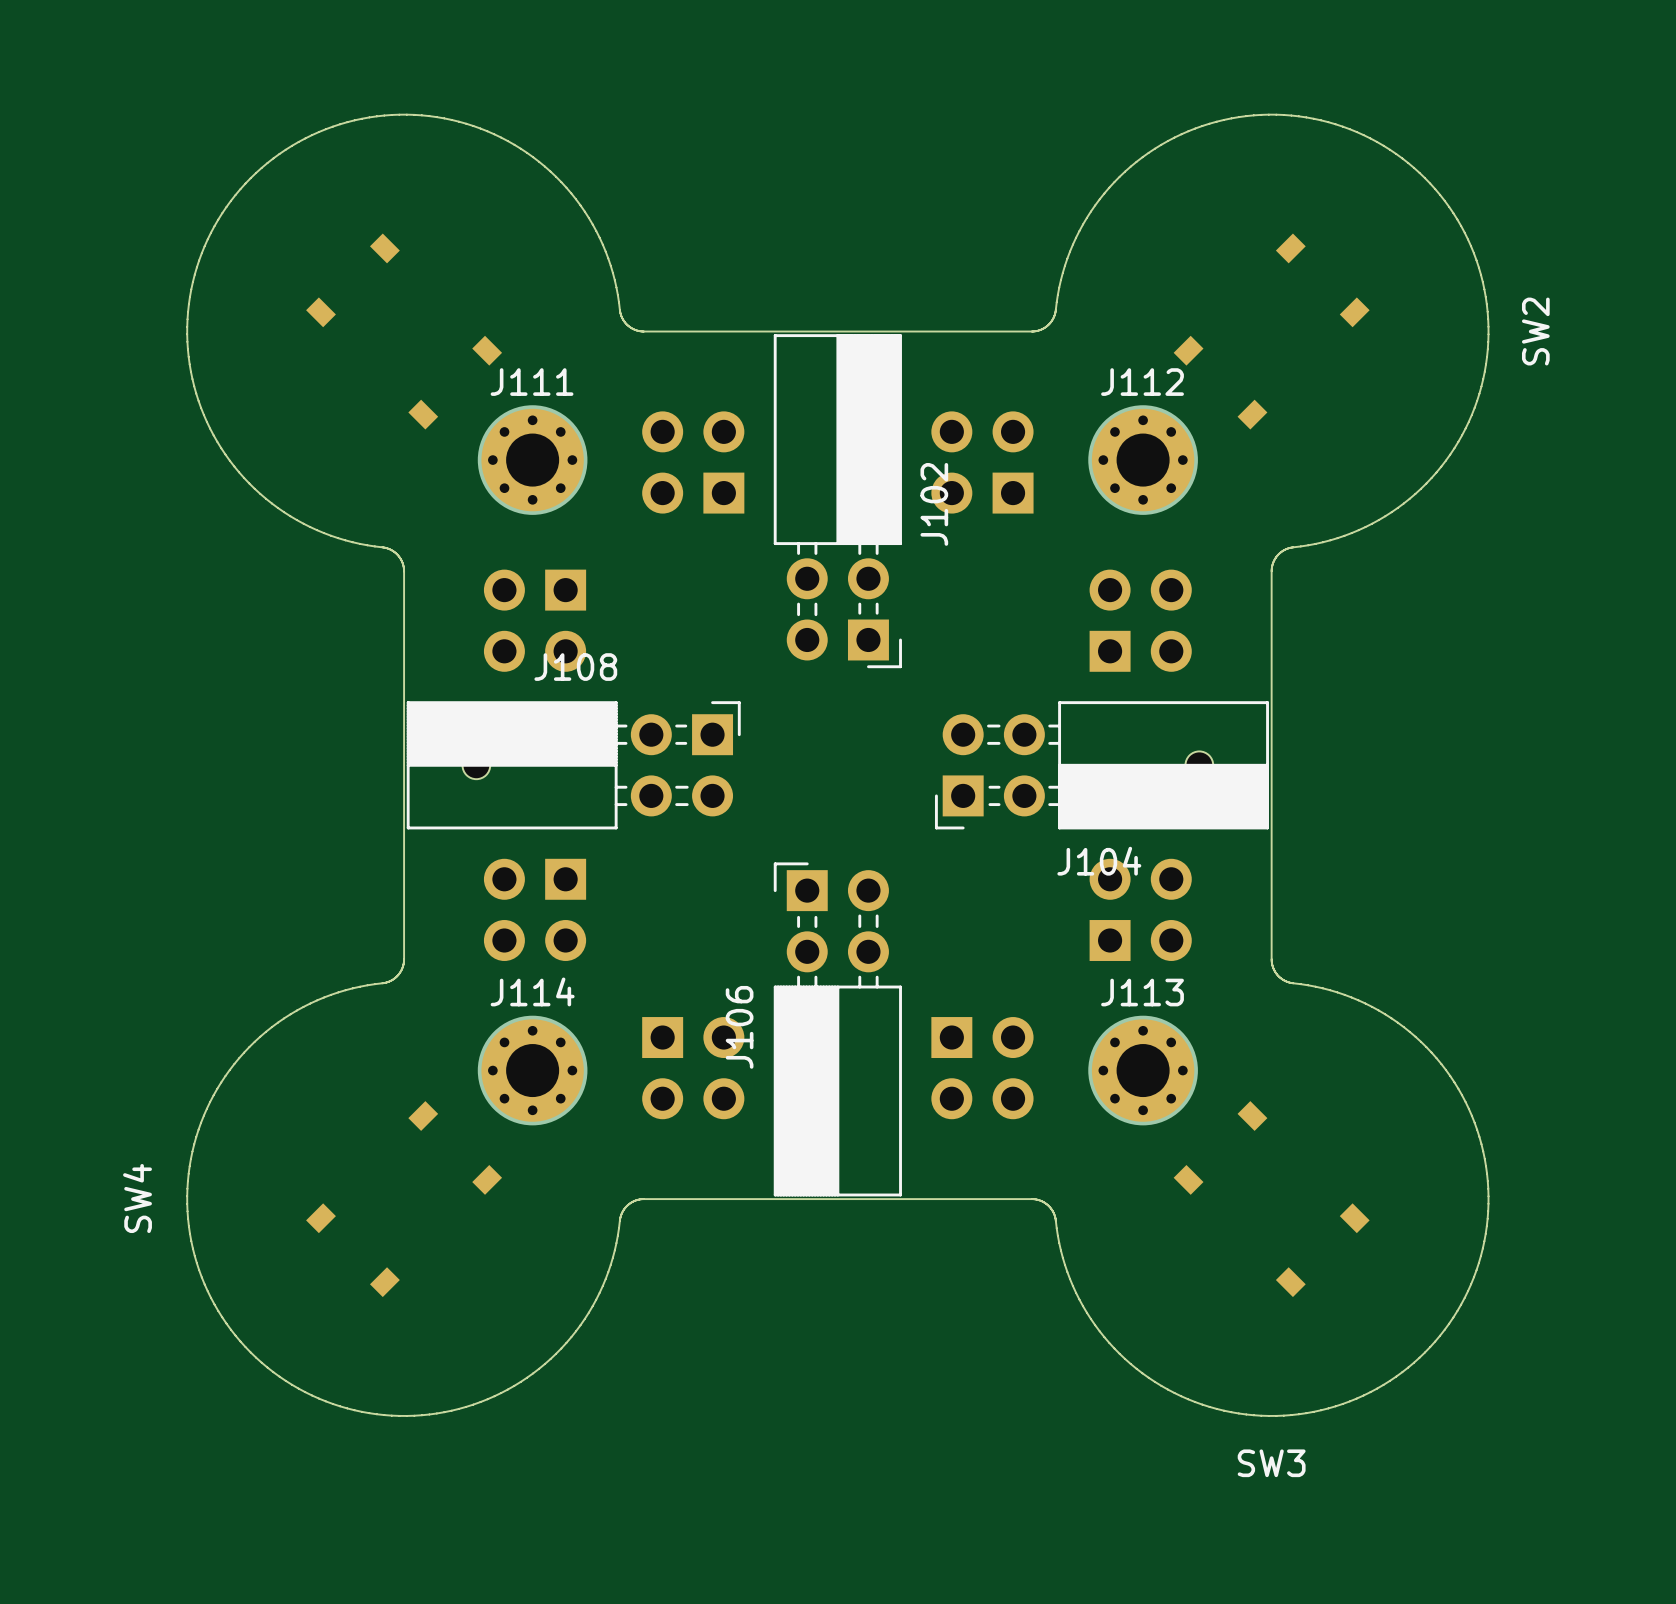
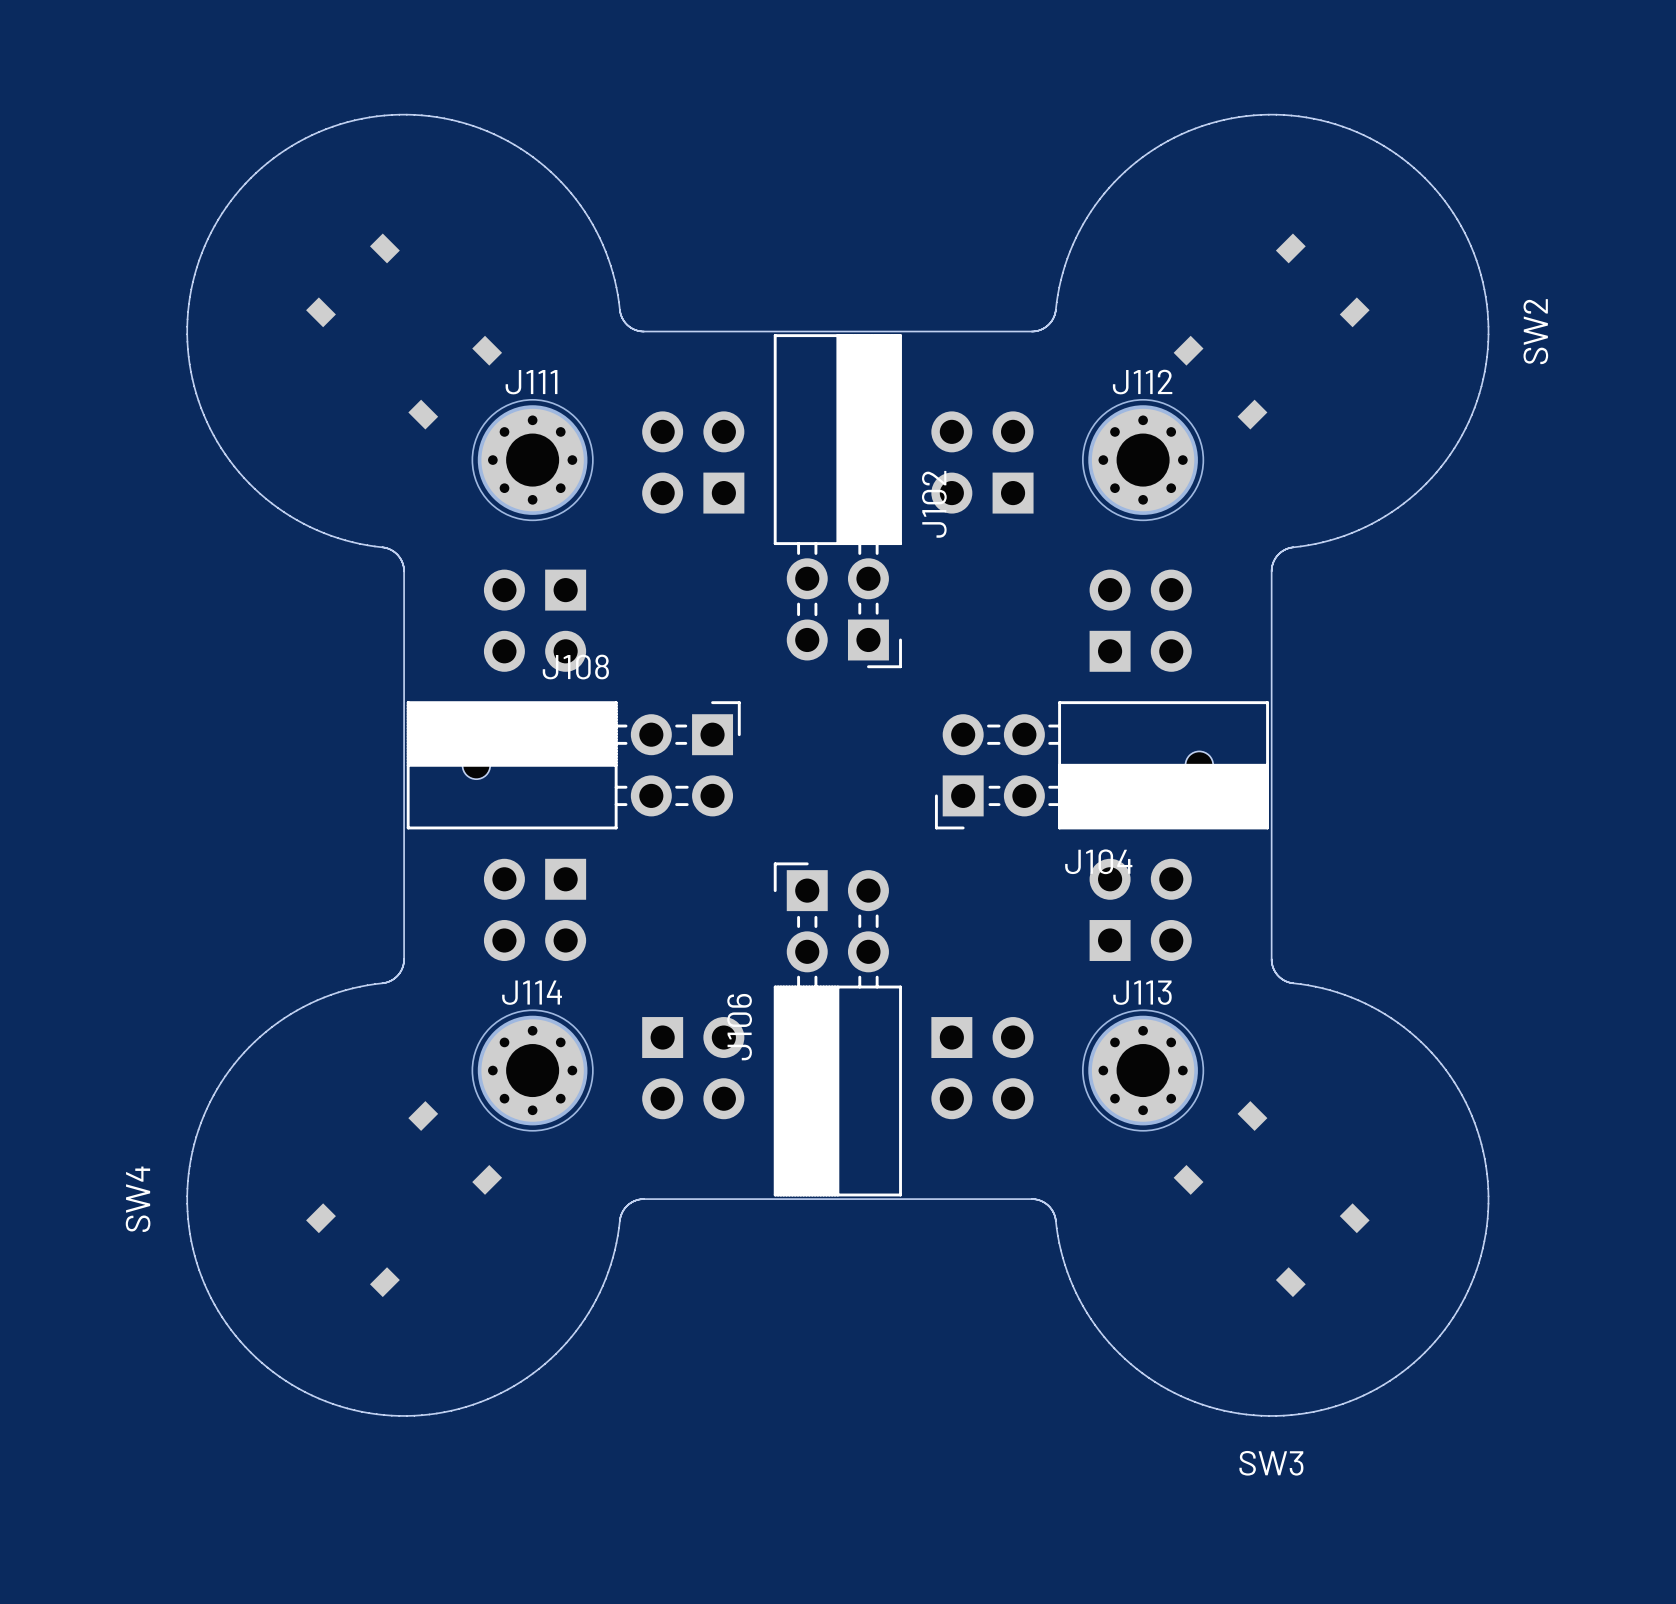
drawing: none -> [471, 399, 594, 521]
drawing: none -> [1082, 399, 1204, 521]
drawing: none -> [471, 1009, 594, 1132]
drawing: none -> [1082, 1009, 1204, 1132]

